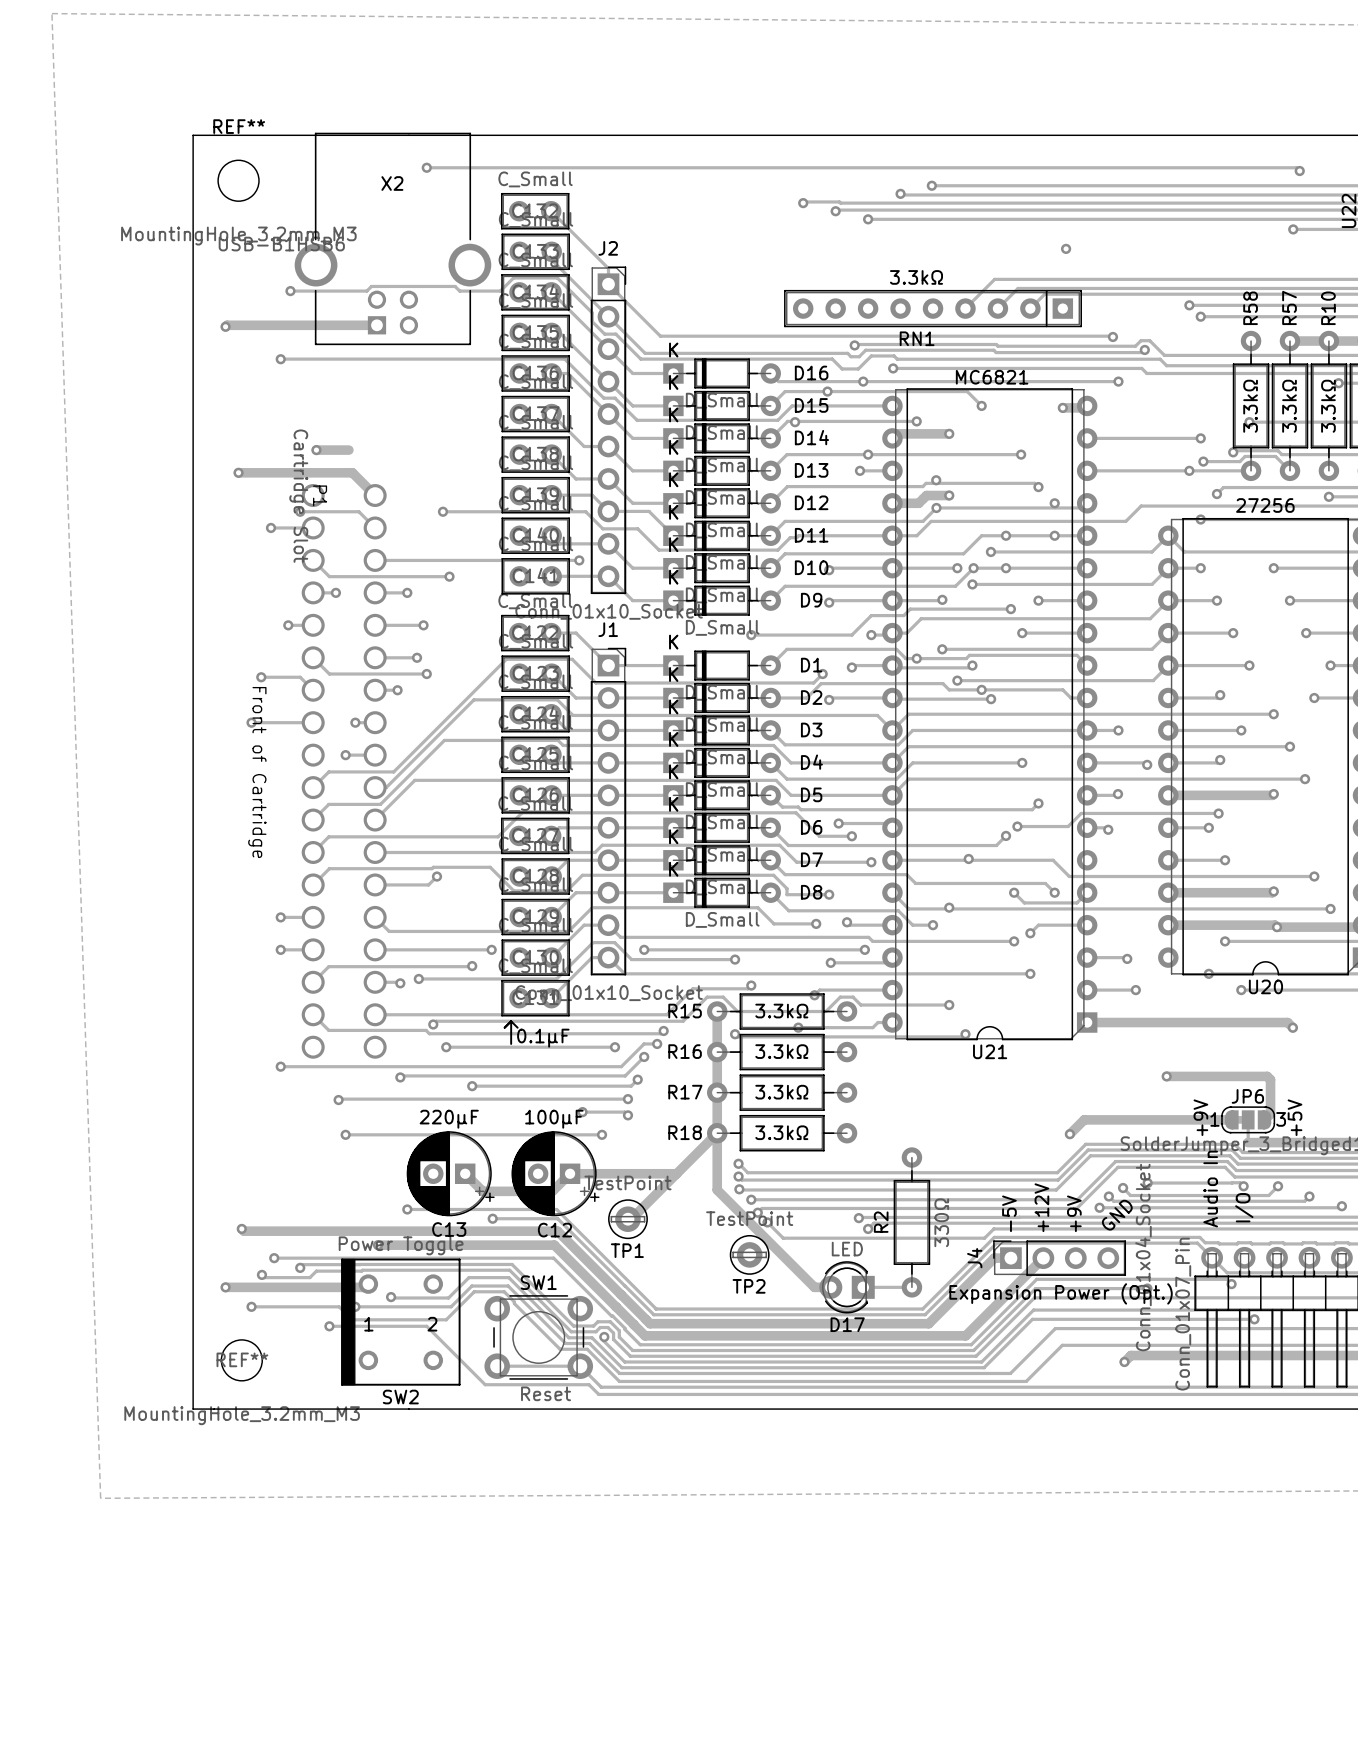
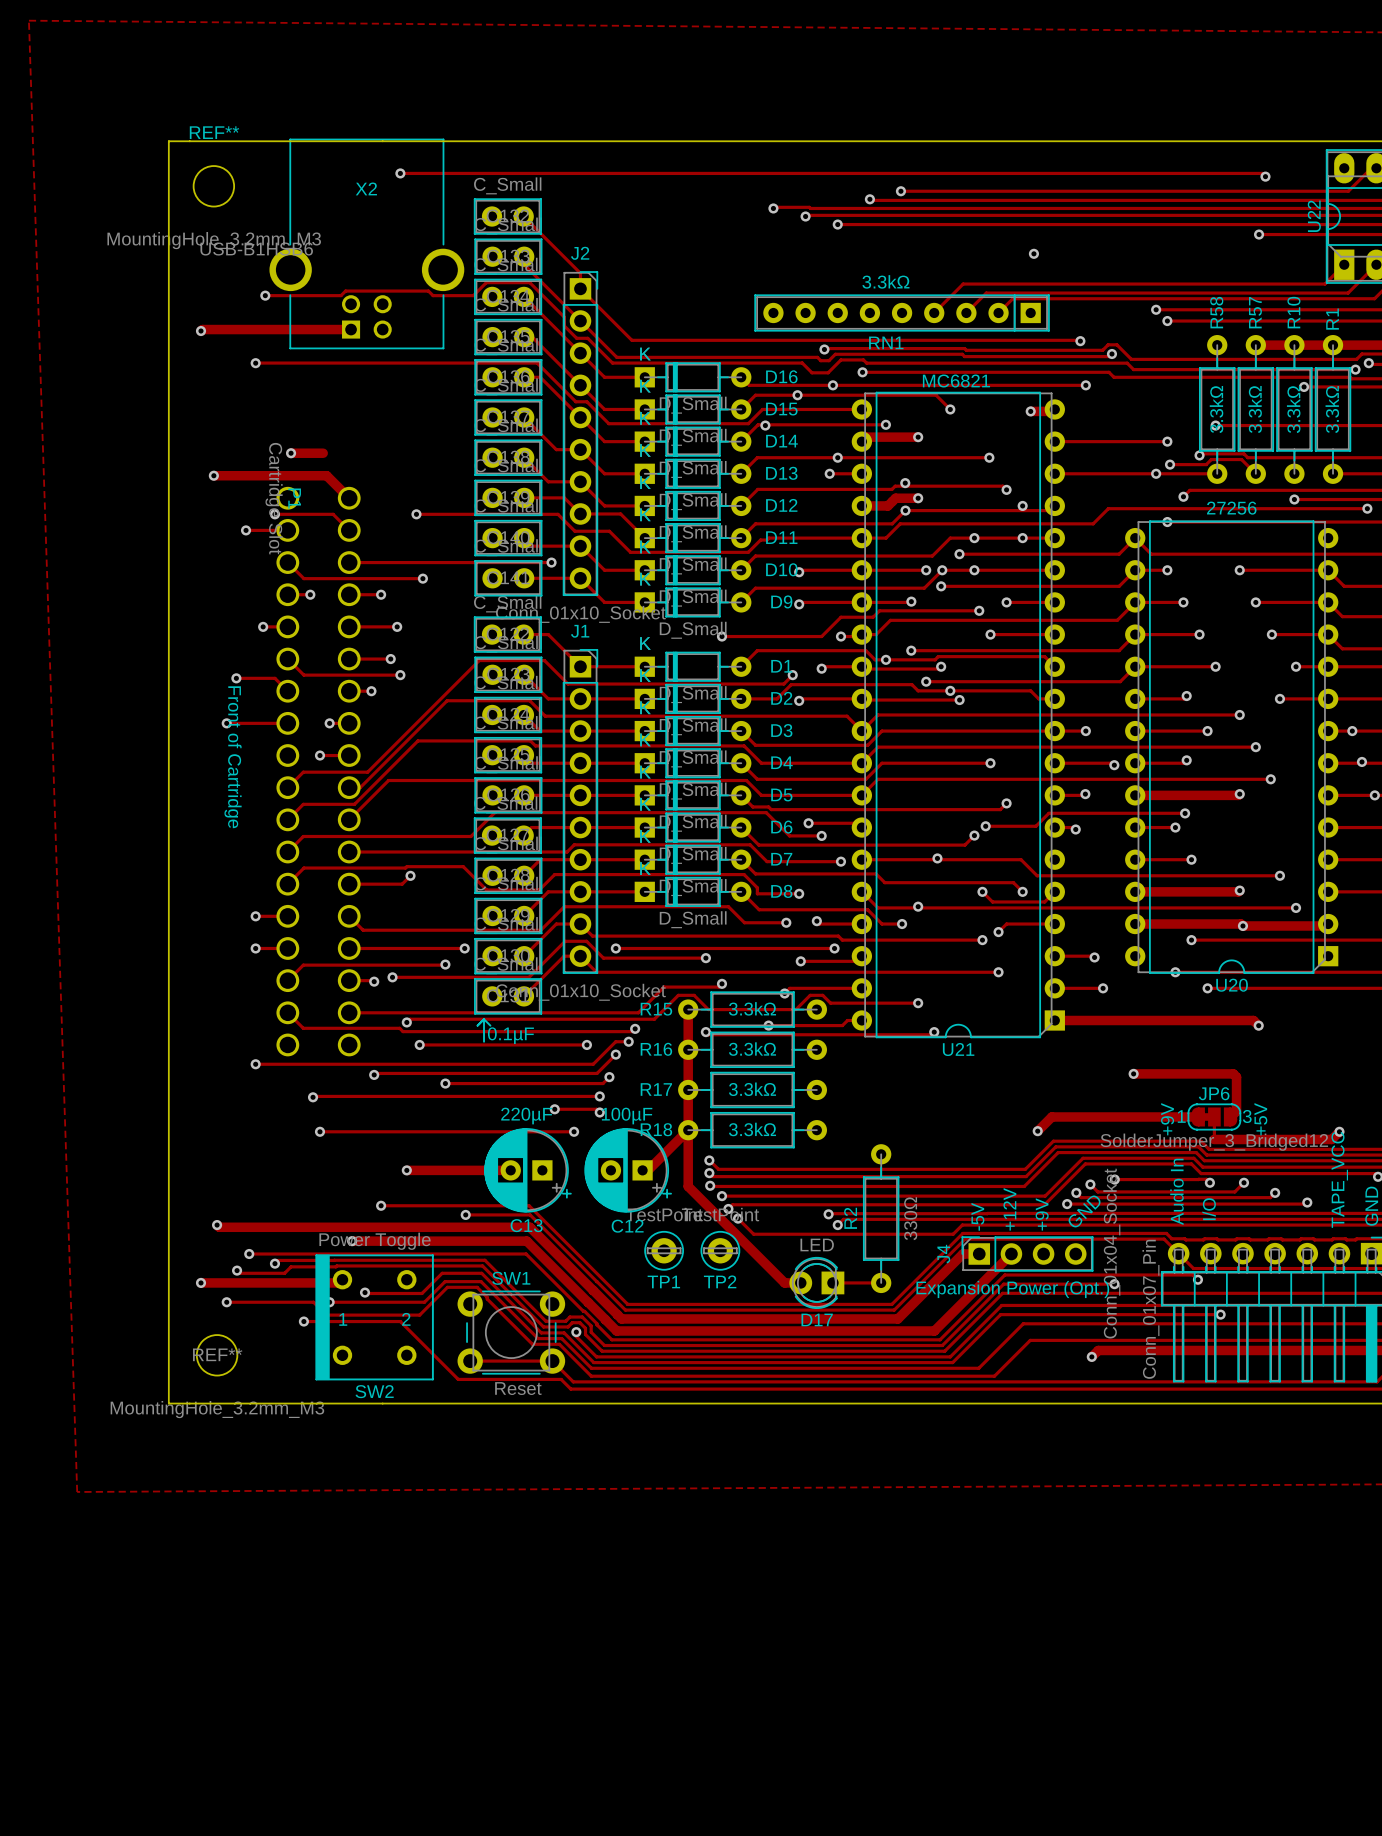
C12 value: 100µF (554, 1119) -> 220µF (526, 1116)
track: none -> (406, 1170) (507, 1170)
via: none -> (406, 1170)
C13: 220µF (450, 1173) -> none
track: (465, 1173) (482, 1191) (552, 1191) (570, 1173) (676, 1173) (627, 1222) -> none
C12: none -> 100µF (628, 1170)
TP1 position: (627, 1219) -> (664, 1250)
C12 name: C12 (554, 1230) -> C13 (526, 1225)

